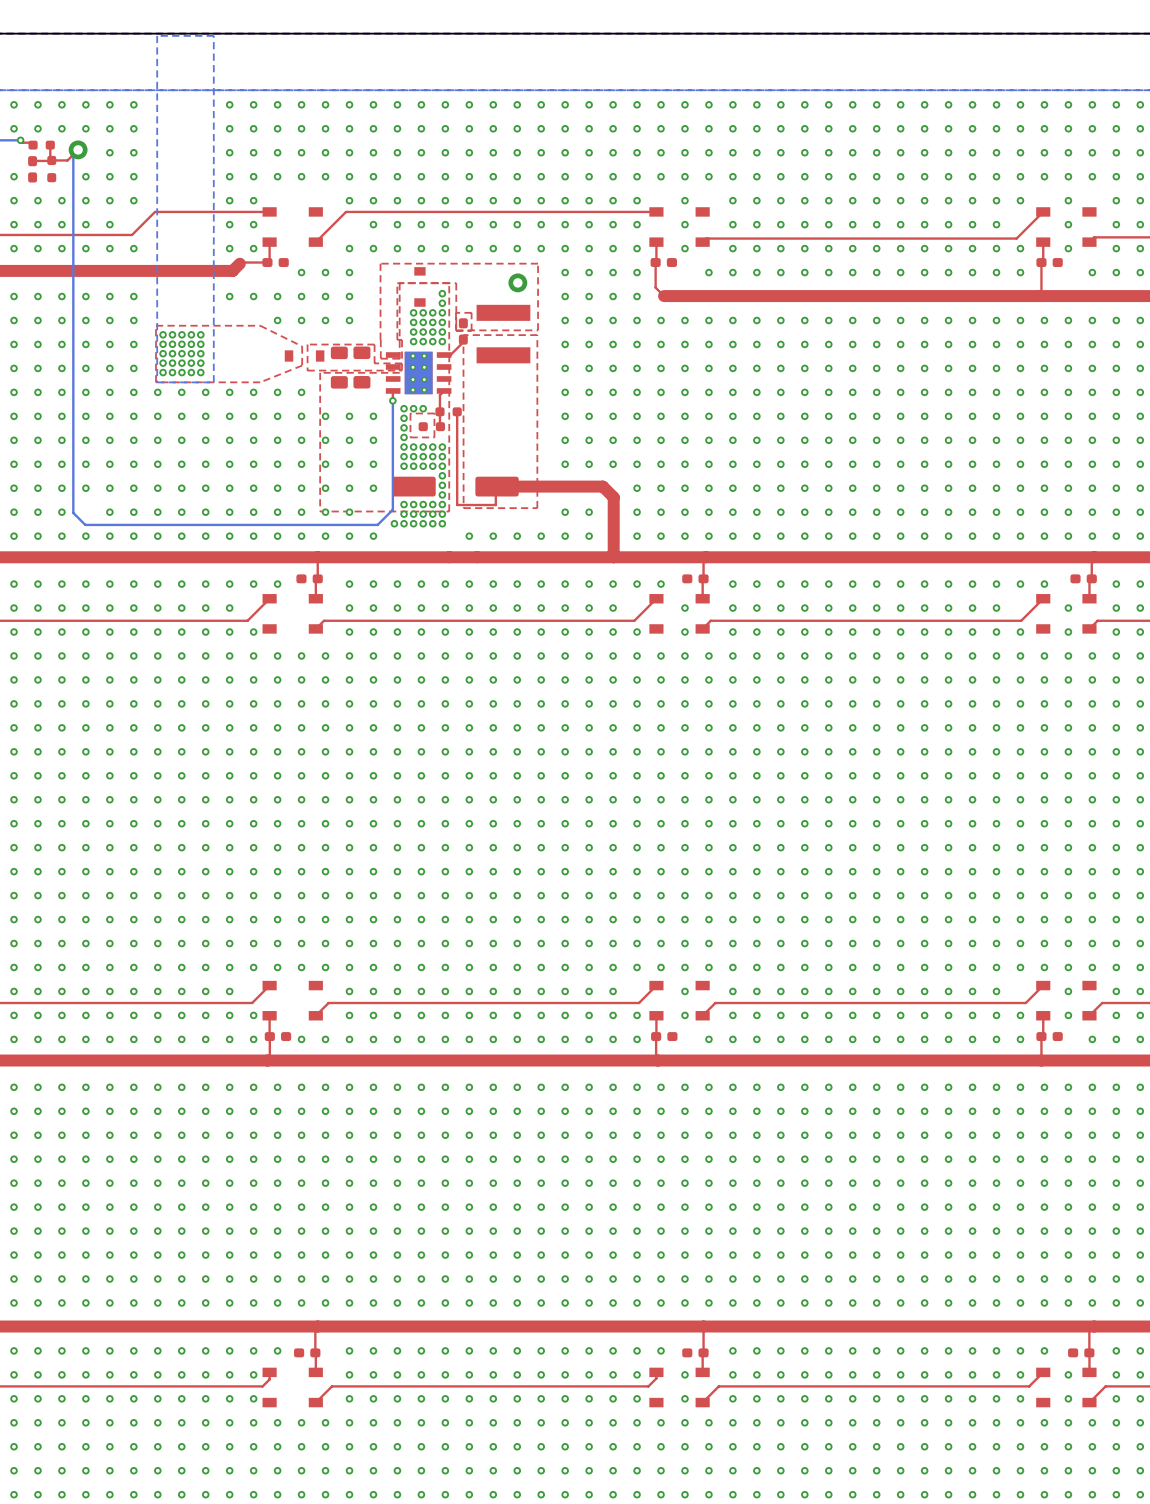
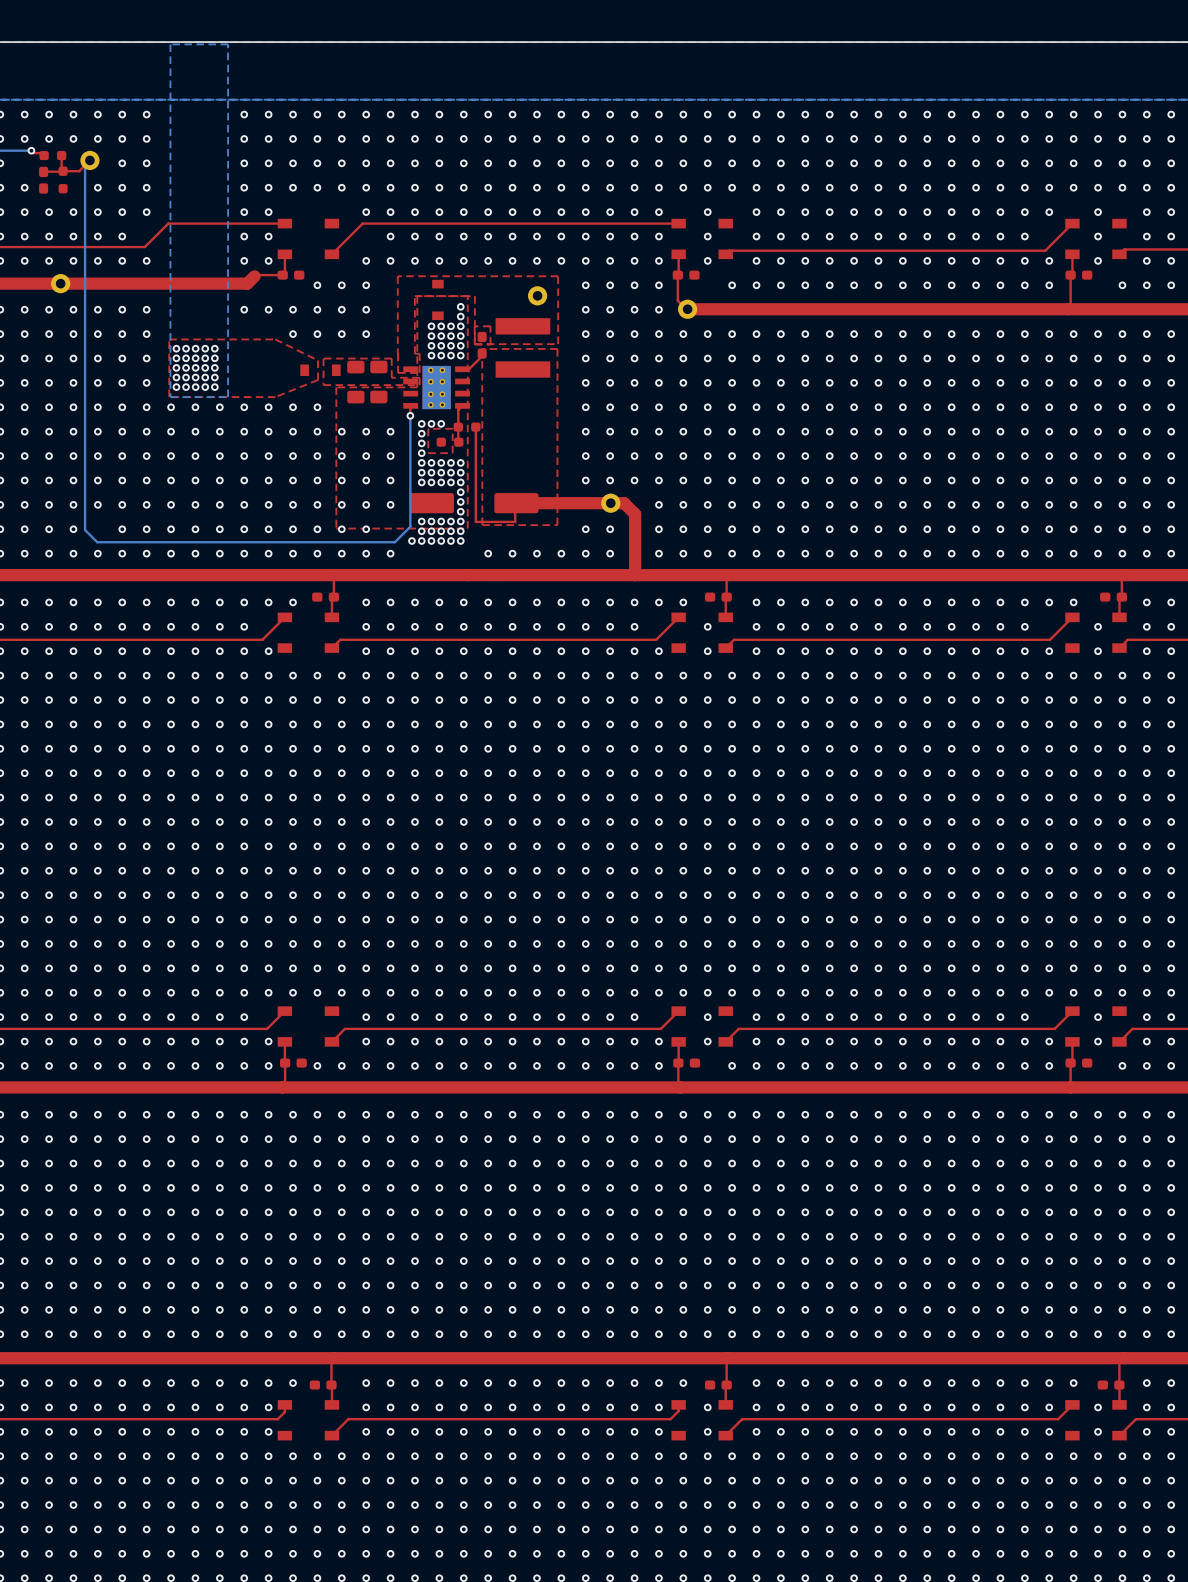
part: none -> (60, 283)
part: none -> (687, 309)
part: none -> (610, 503)

